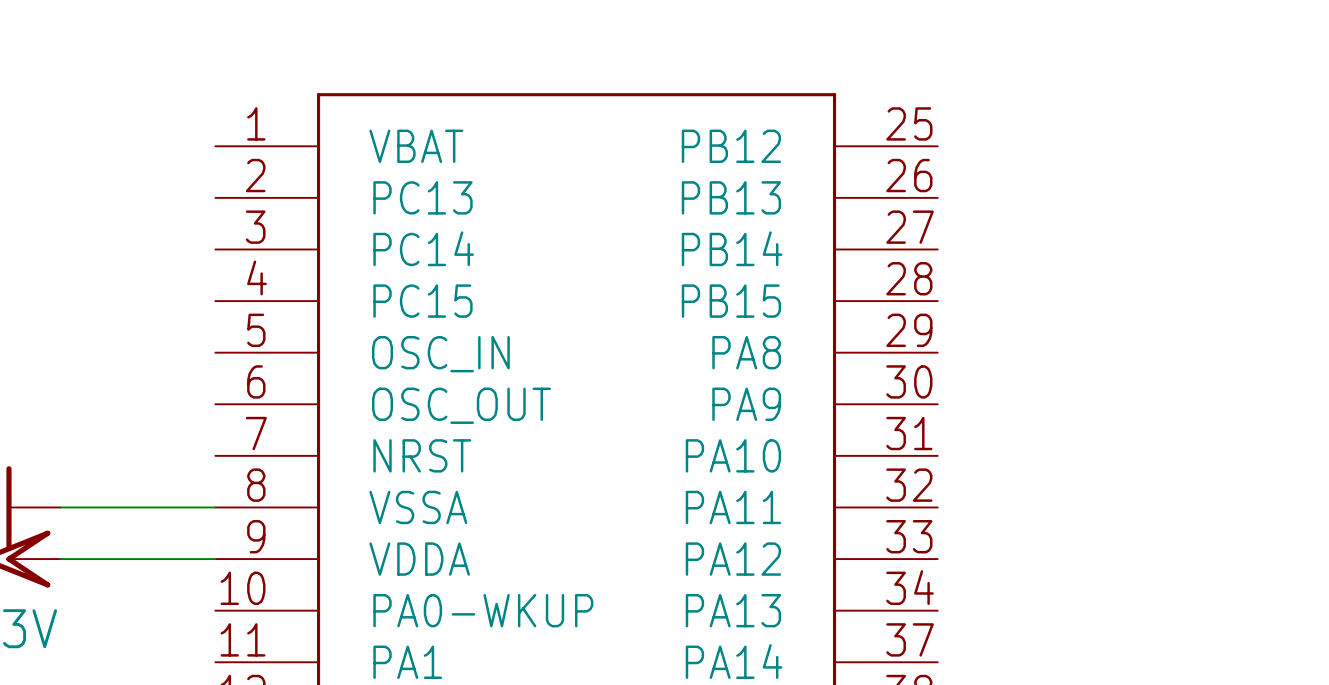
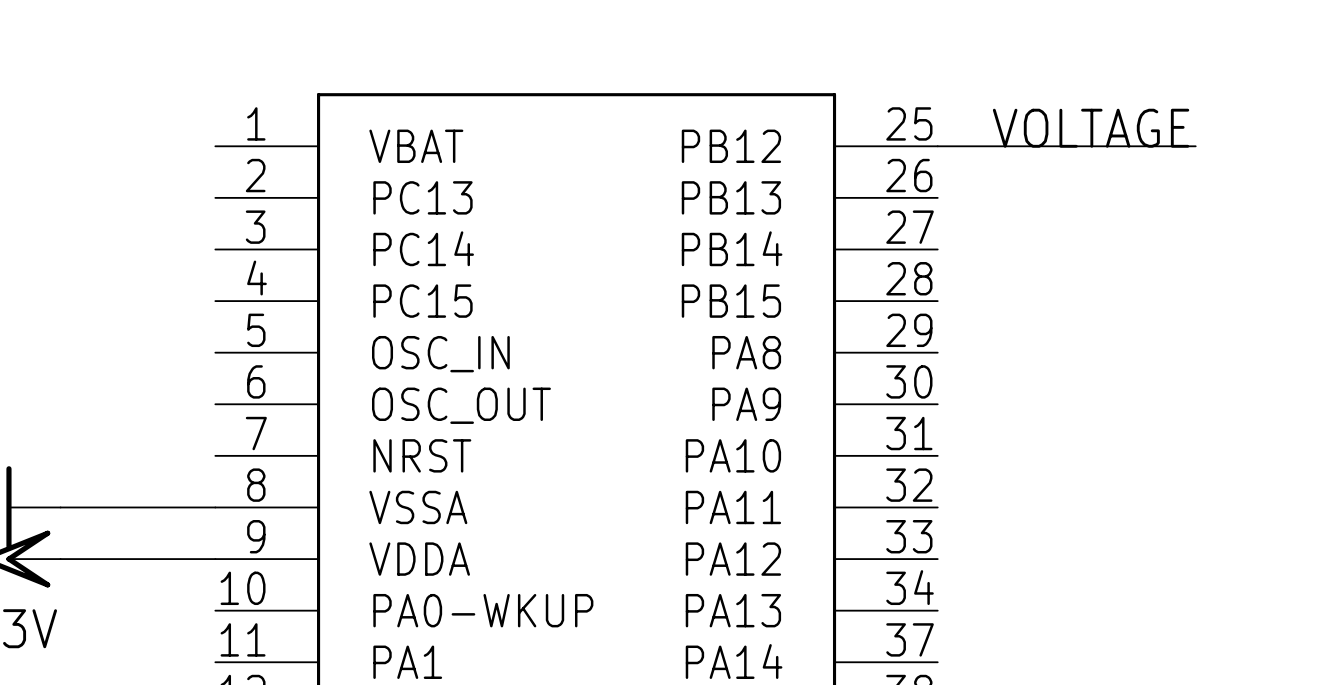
label: none -> VOLTAGE (1091, 128)
wire: none -> (937, 146) (1195, 146)

